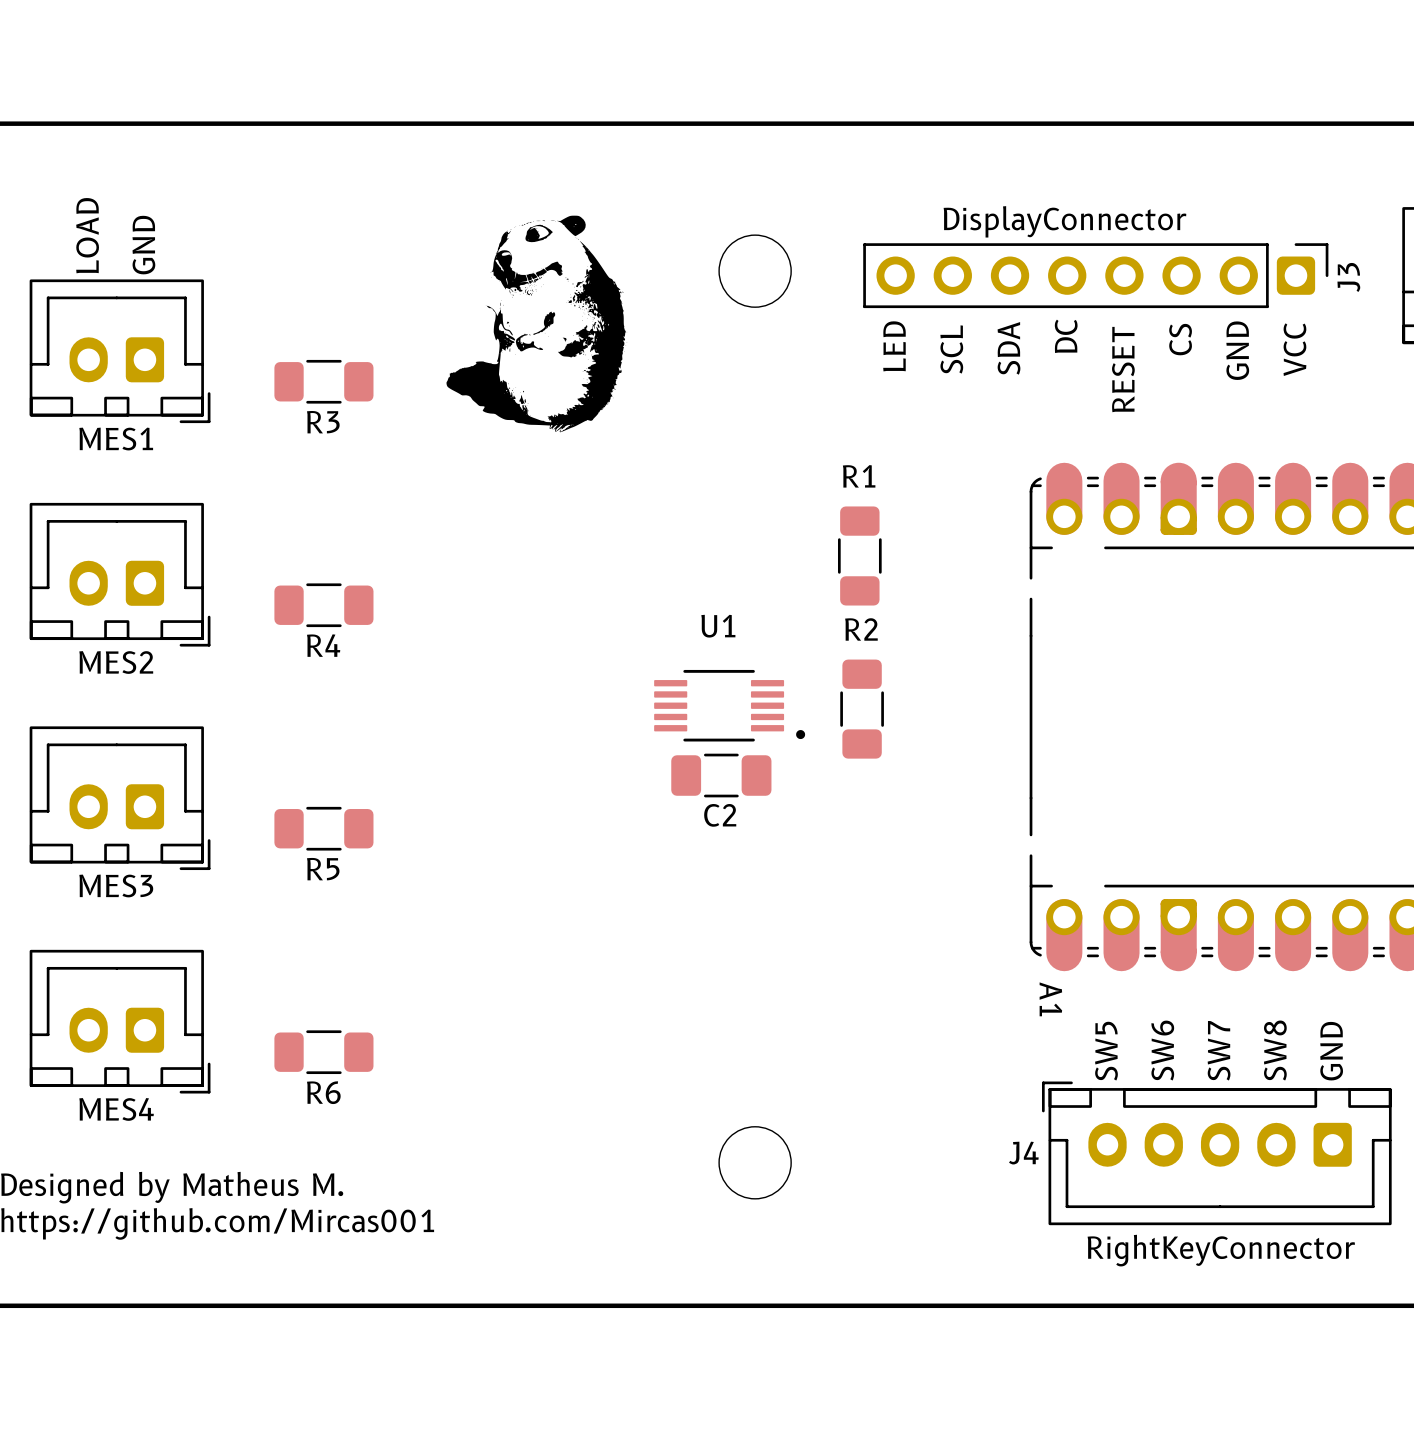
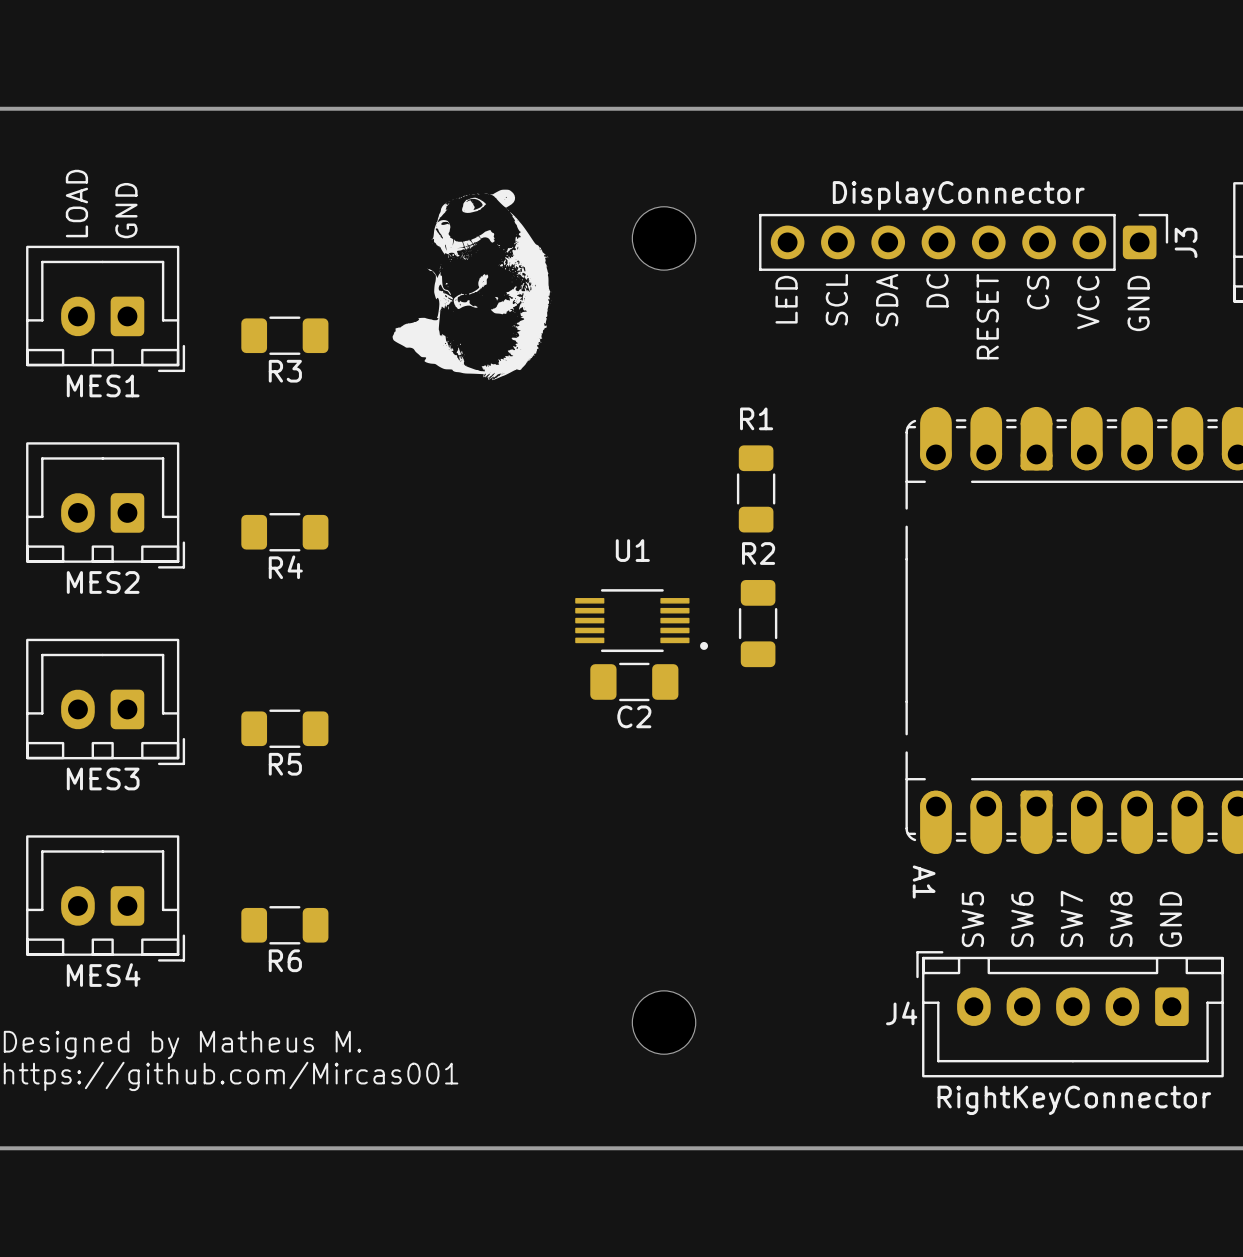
text: VCC (1294, 349) -> GND (1138, 303)
text: GND (1237, 350) -> VCC (1088, 302)

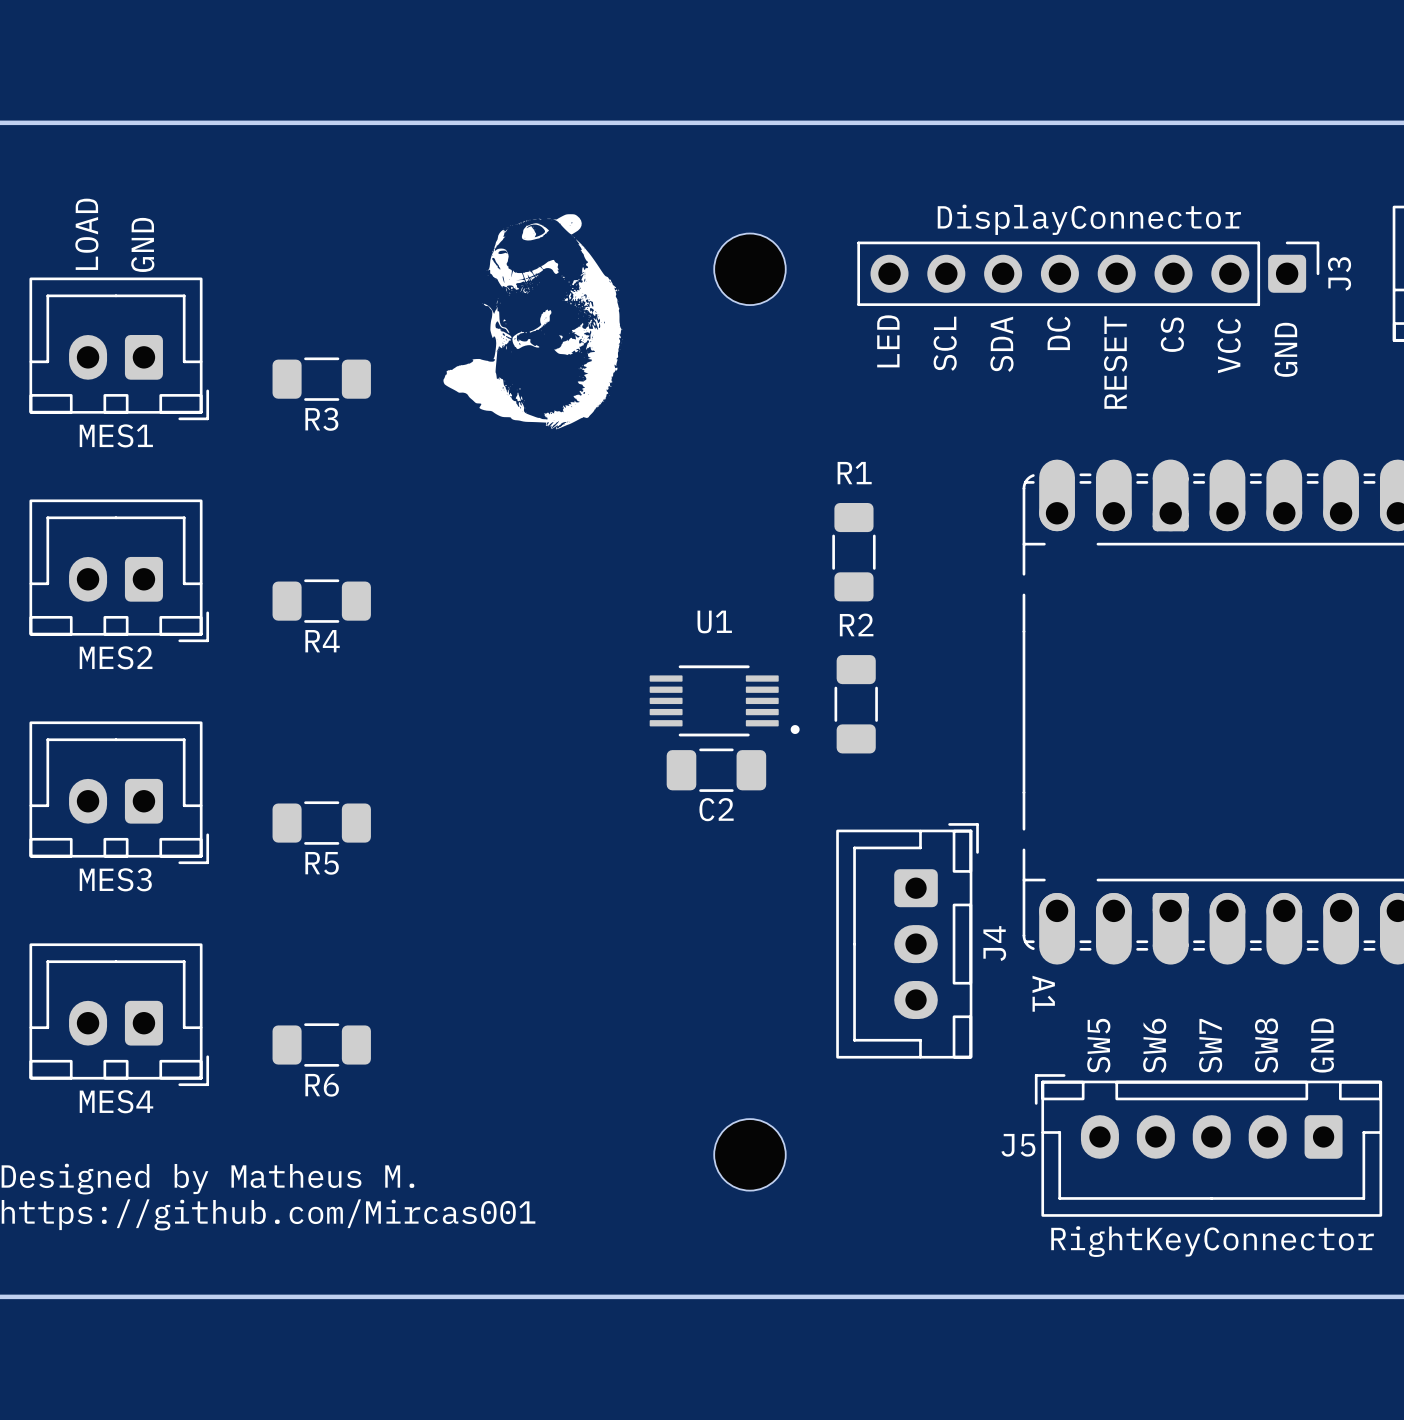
J4: none -> (907, 940)
J4 name: J4 (901, 1013) -> J5 (1018, 1145)

